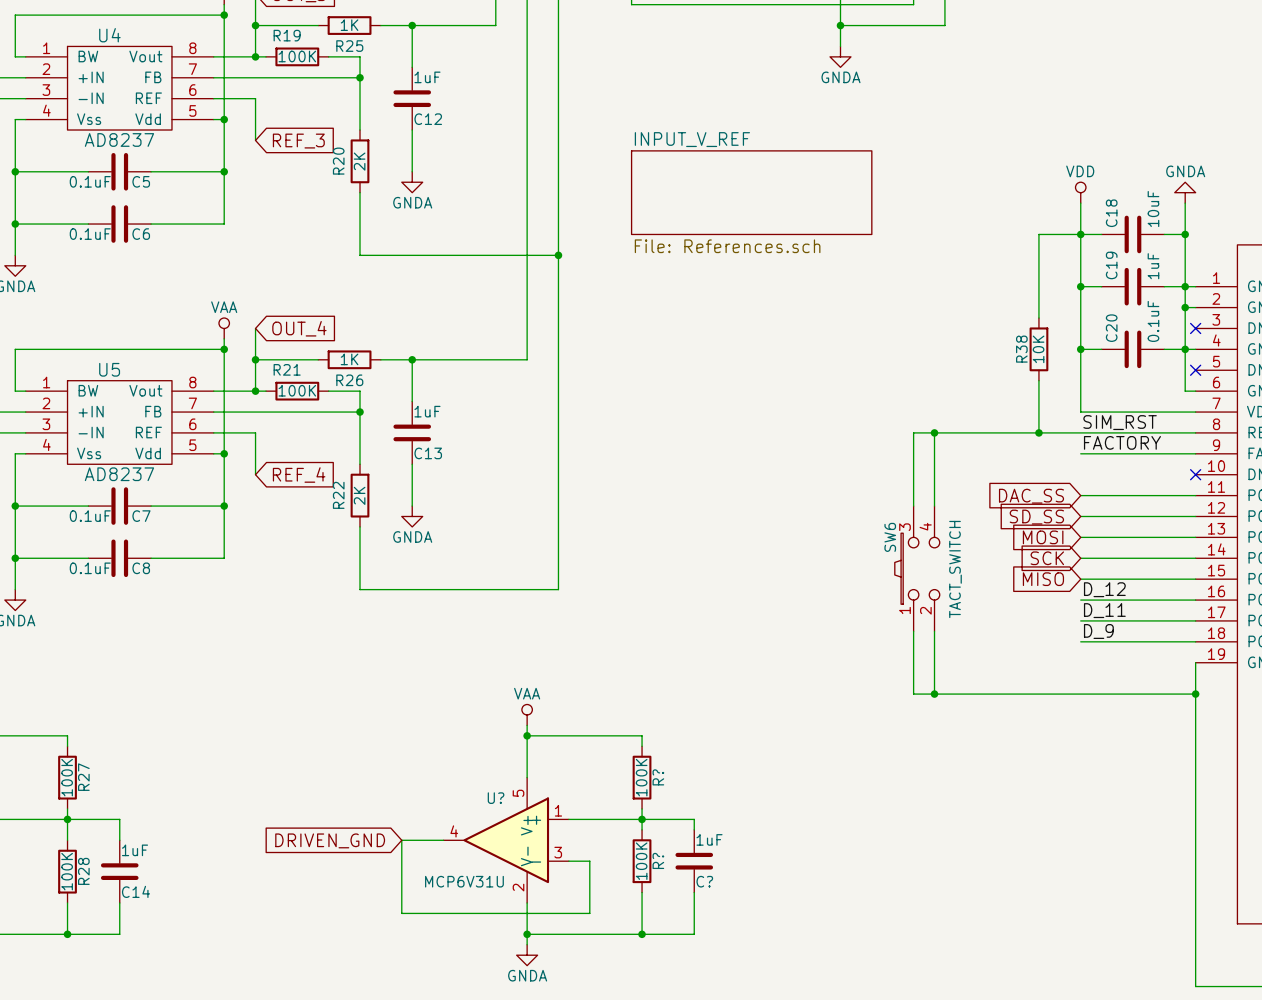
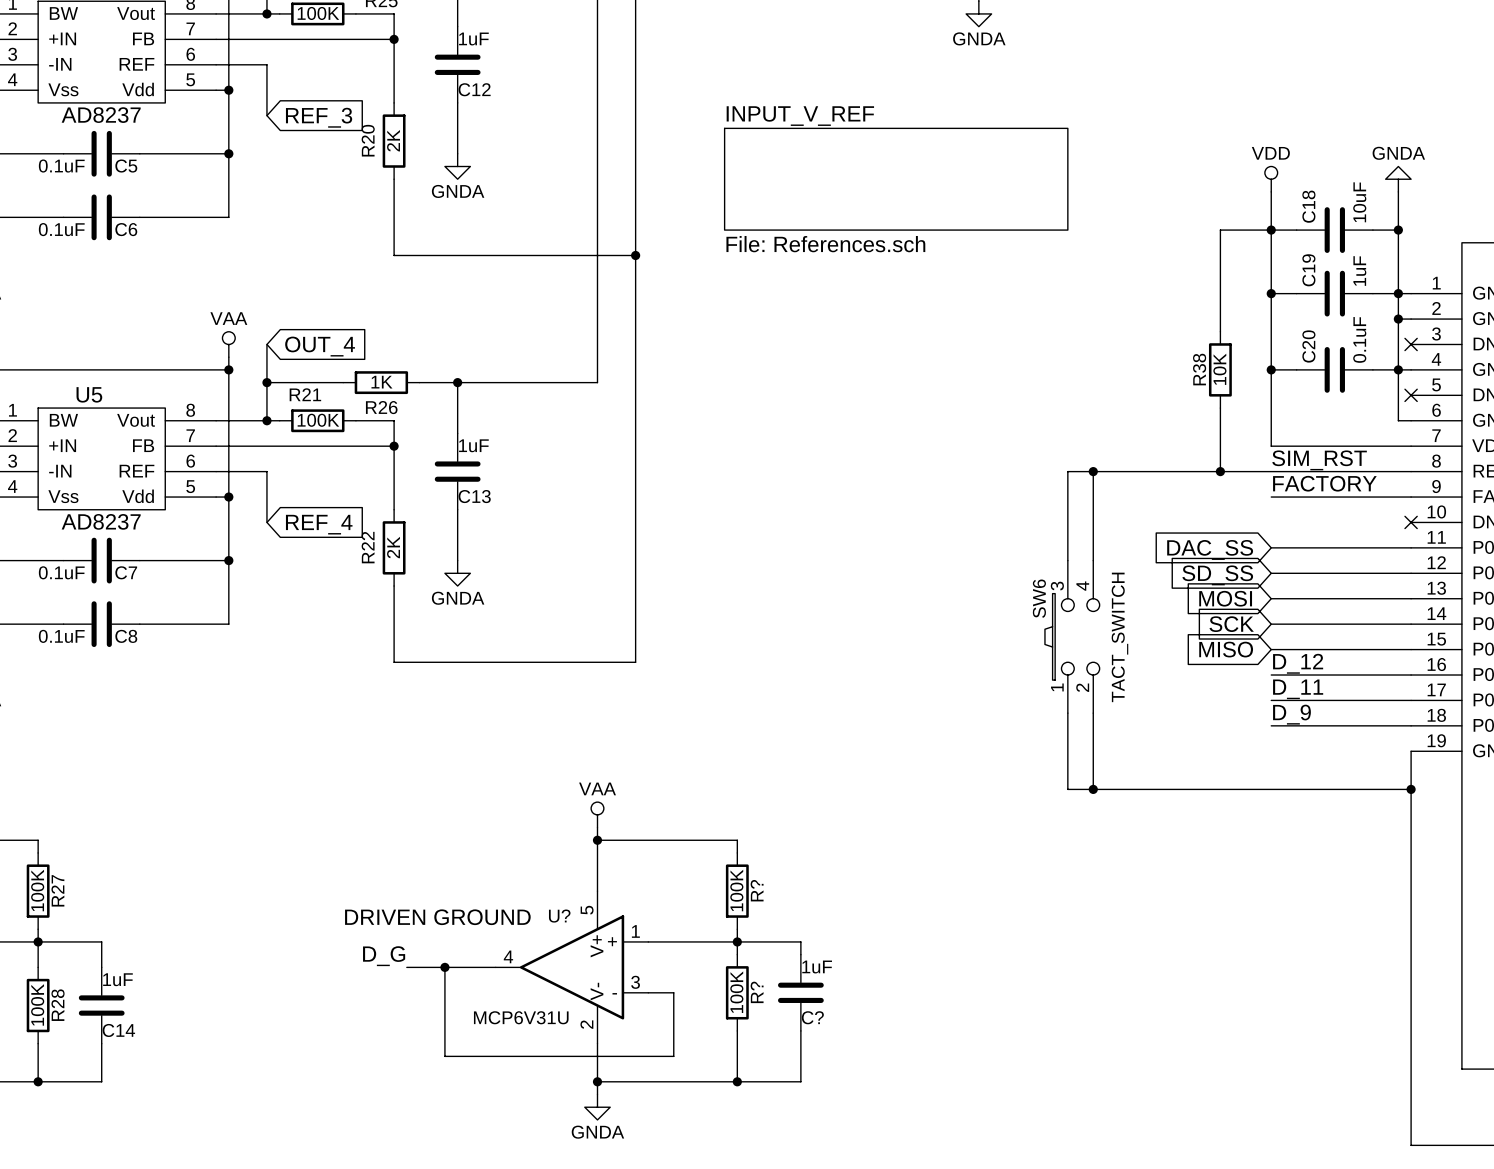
sheet INPUT_V_REF: File: References.sch (751, 192) -> none
sheet INPUT_V_REF: none -> File: References.sch (896, 179)
text: none -> DRIVEN GROUND (437, 917)
label: none -> D_G (384, 956)
global label: DRIVEN_GND (330, 840) -> none
wire: none -> (406, 967) (444, 967)
junction: none -> (444, 967)

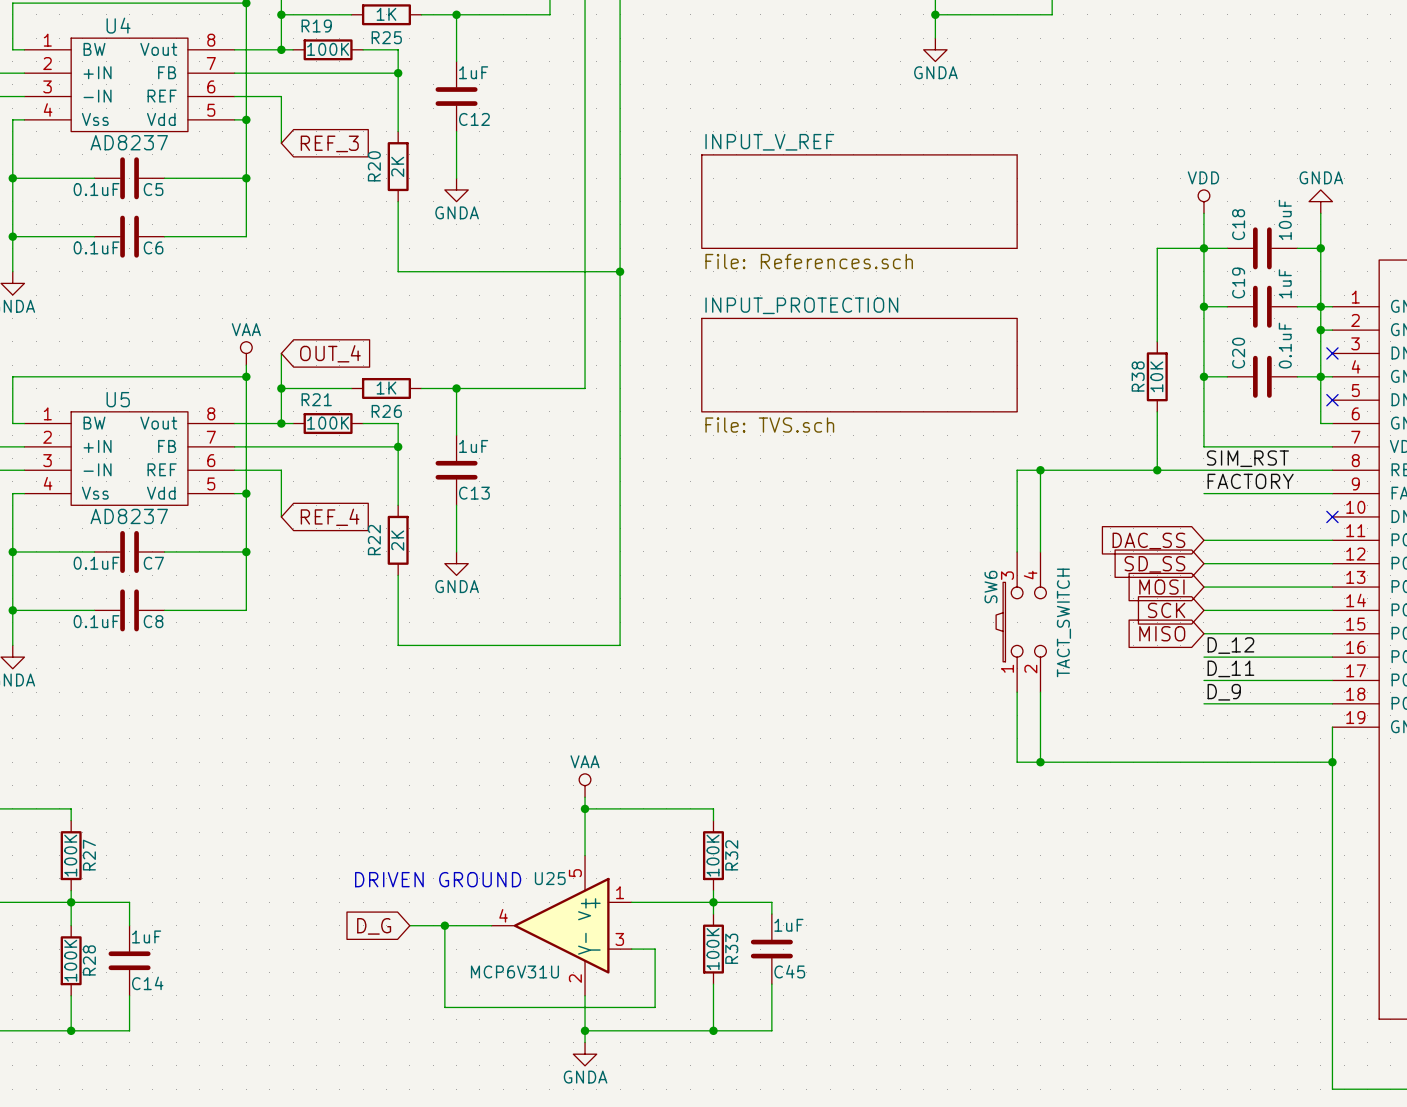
sheet INPUT_PROTECTION: none -> File: TVS.sch (859, 365)
R? name: R? (757, 890) -> R32 (731, 855)
U? name: U? (559, 916) -> U25 (550, 878)
label: D_G (384, 956) -> none
global label: none -> D_G (374, 926)
R? name: R? (757, 992) -> R33 (731, 948)
C? name: C? (812, 1017) -> C45 (789, 971)

